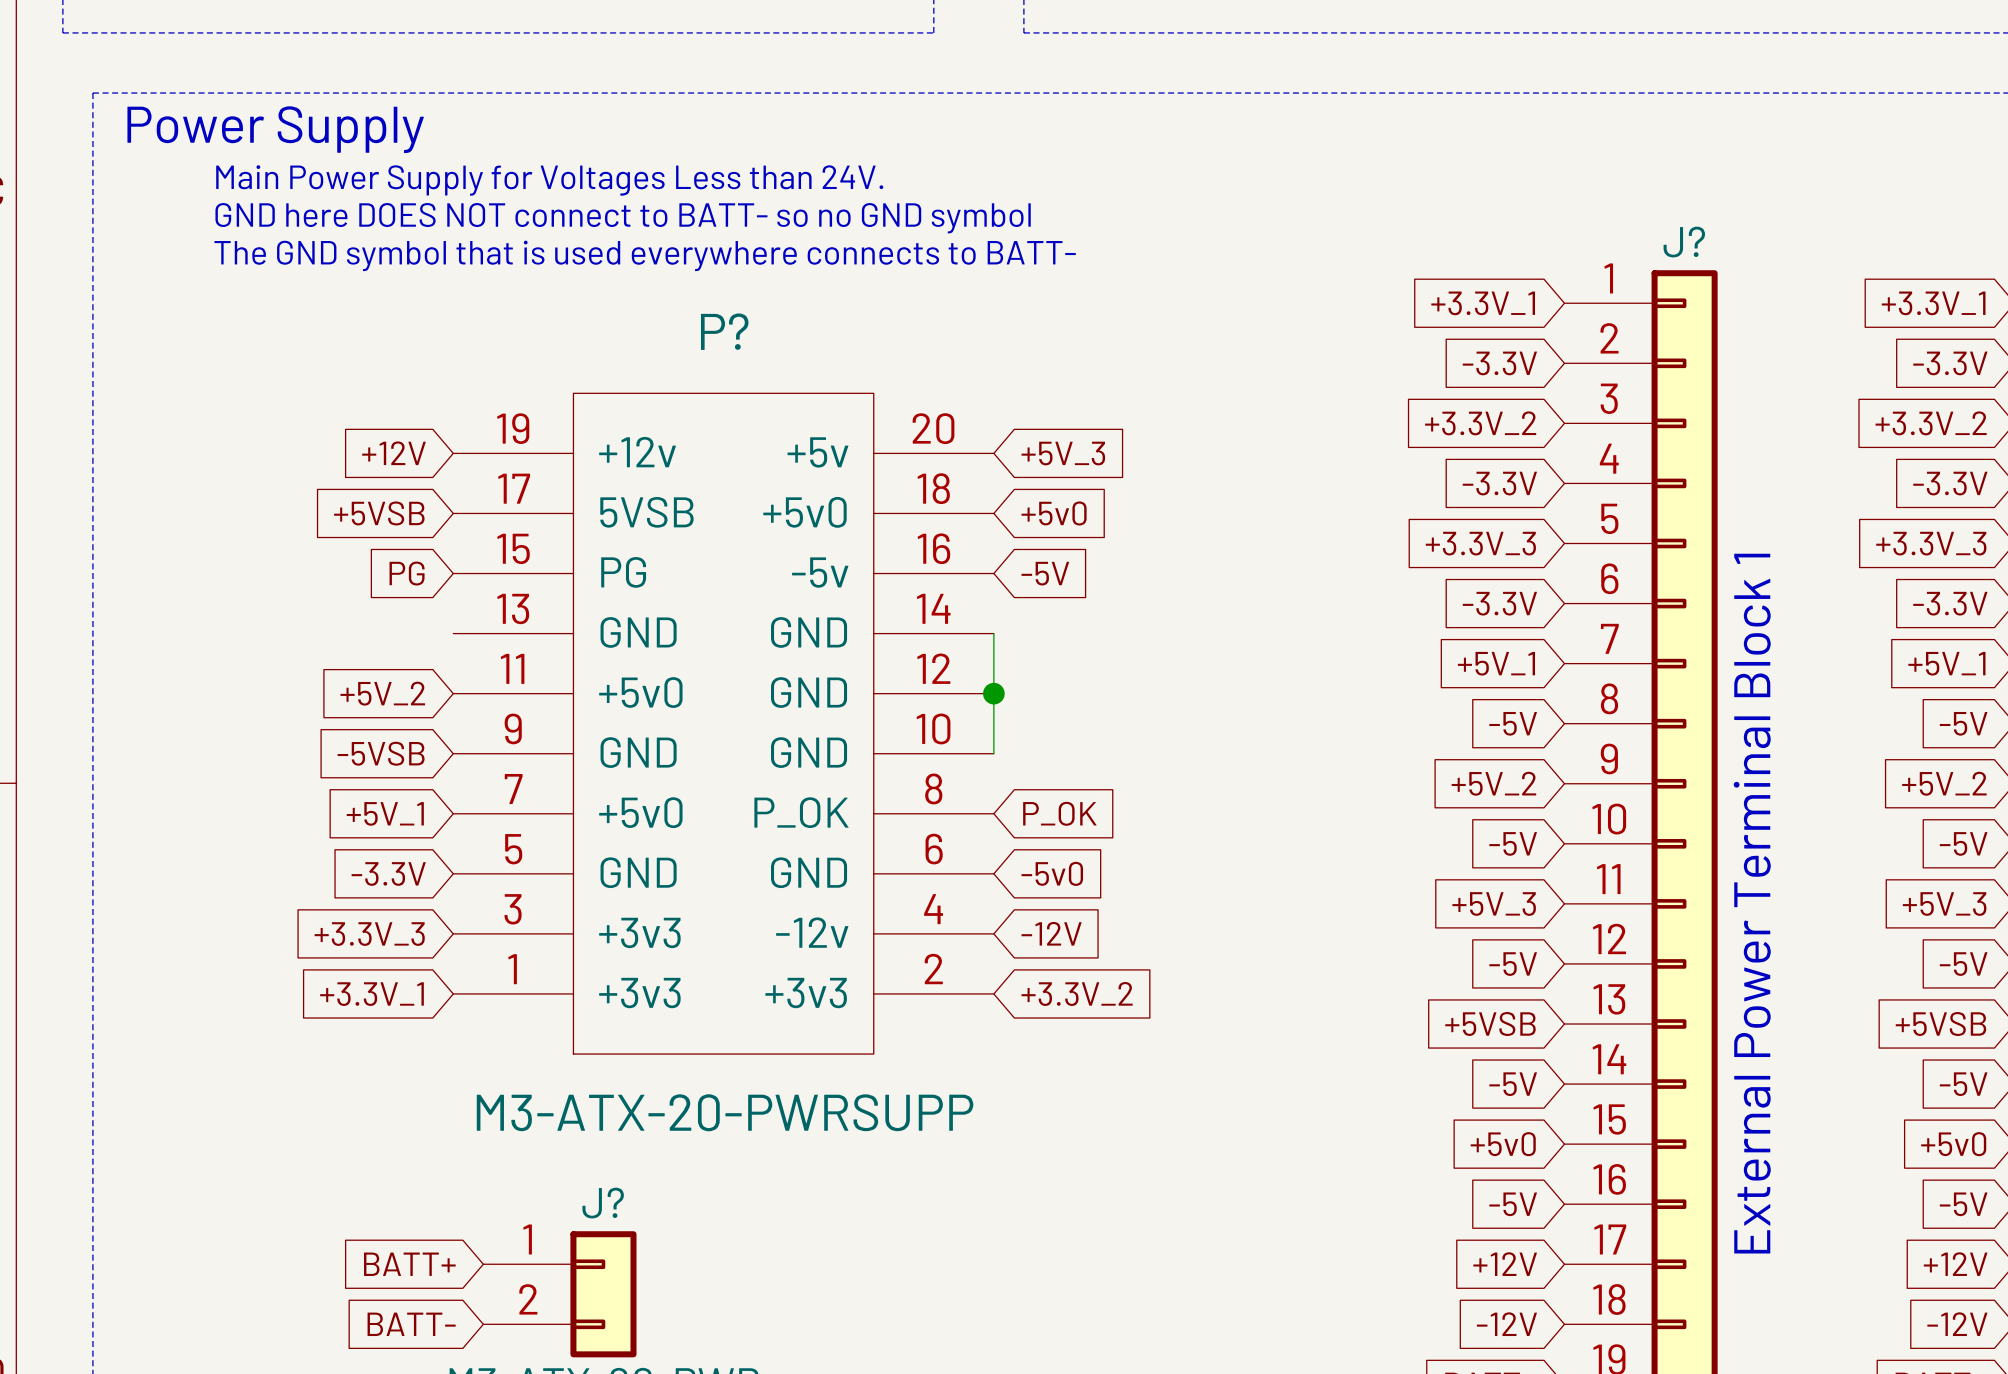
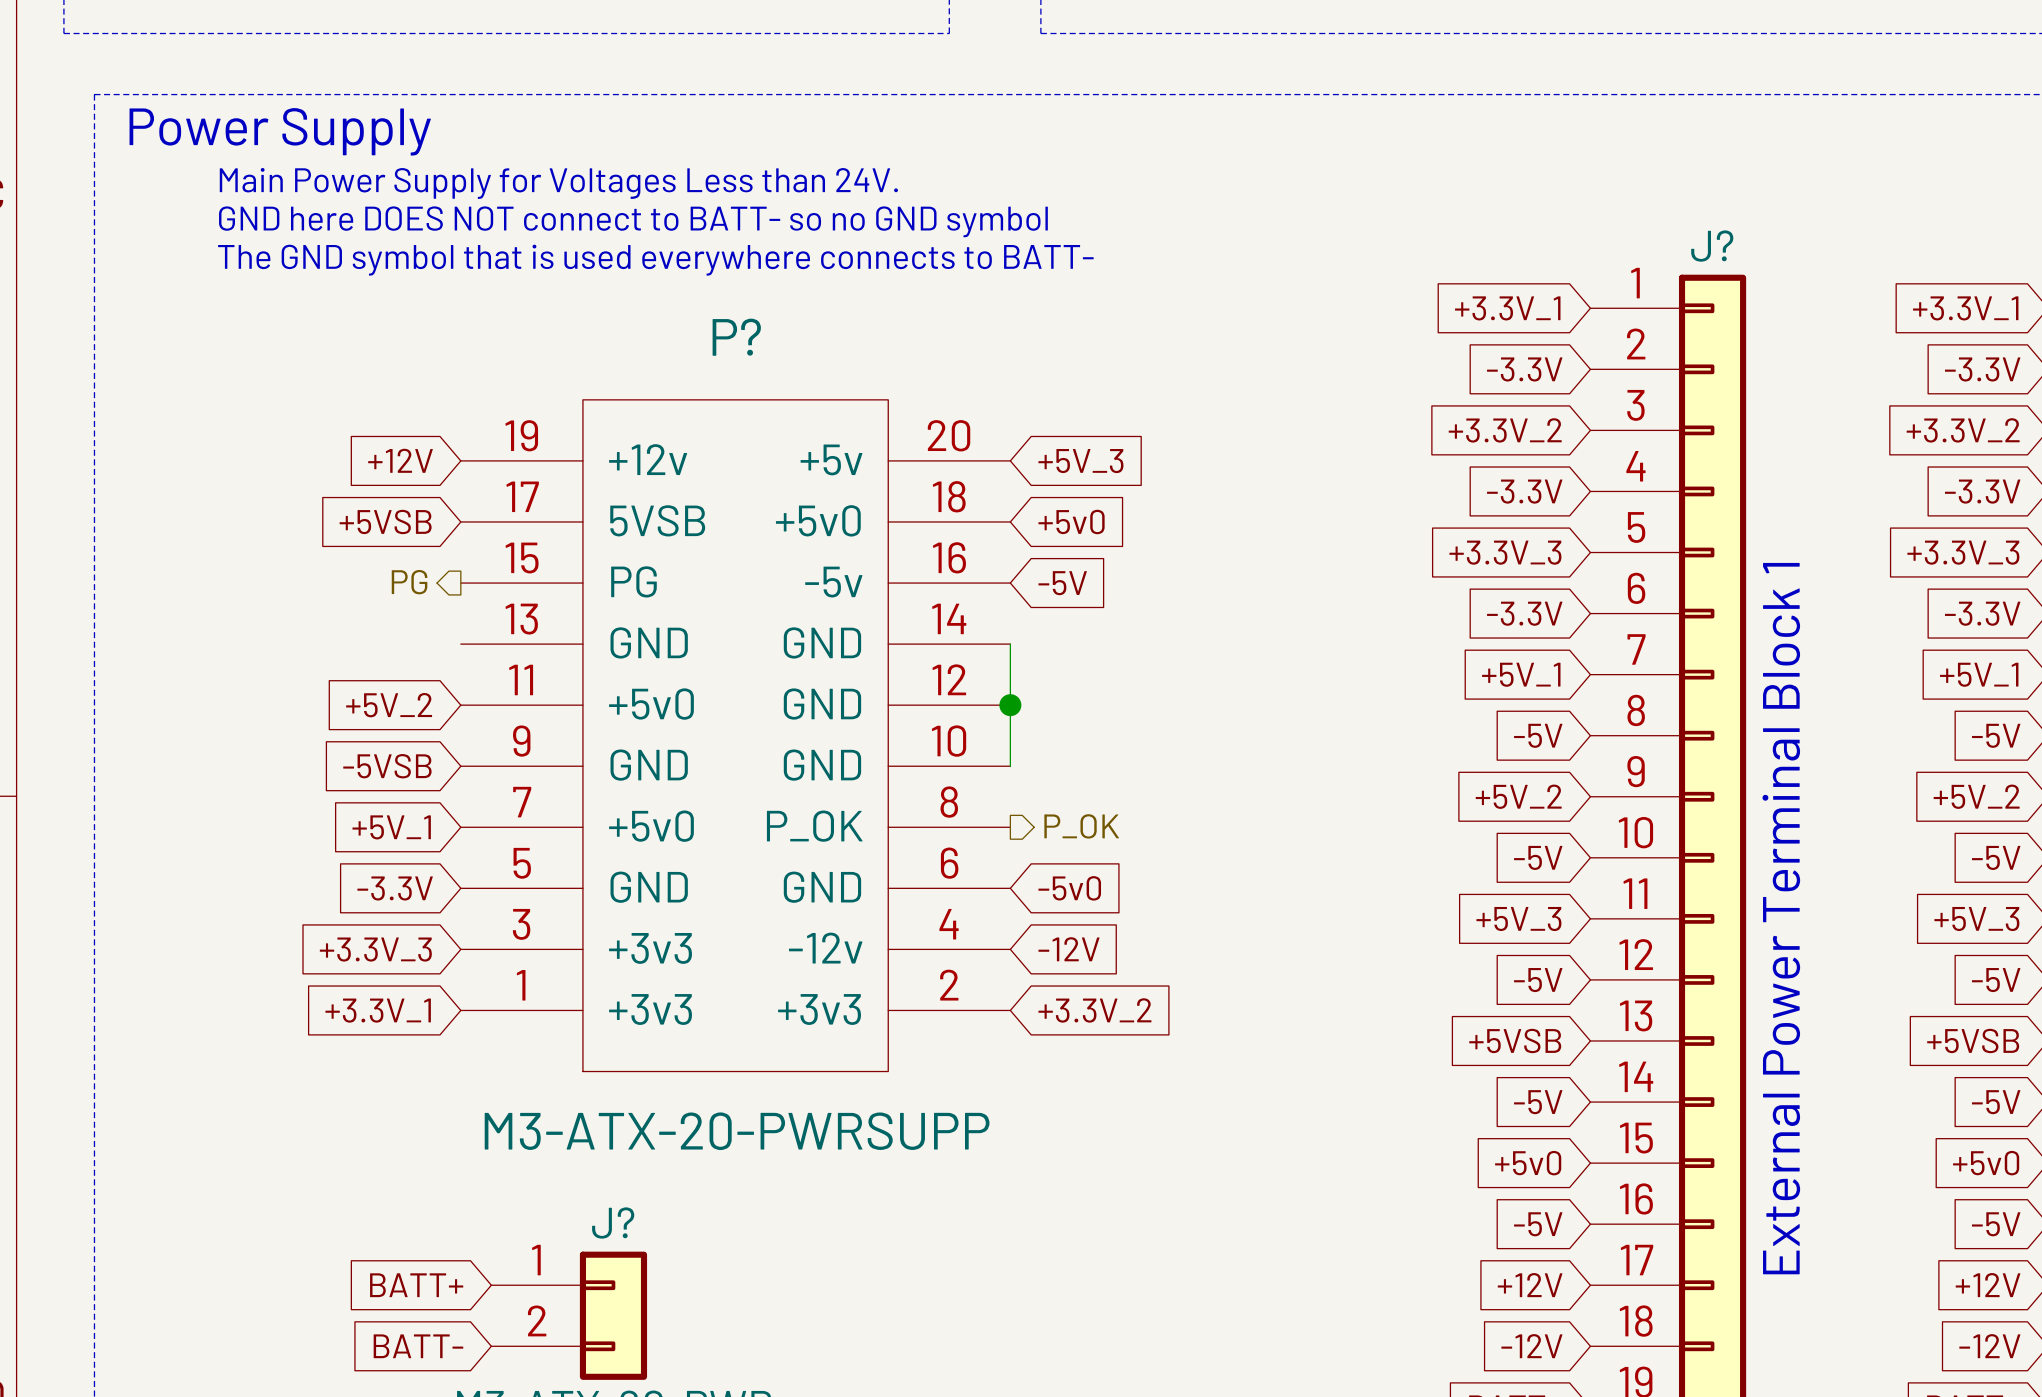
hierarchical label: none -> PG (409, 582)
global label: PG (407, 573) -> none
hierarchical label: none -> P_OK (1081, 826)
global label: P_OK (1059, 813) -> none

